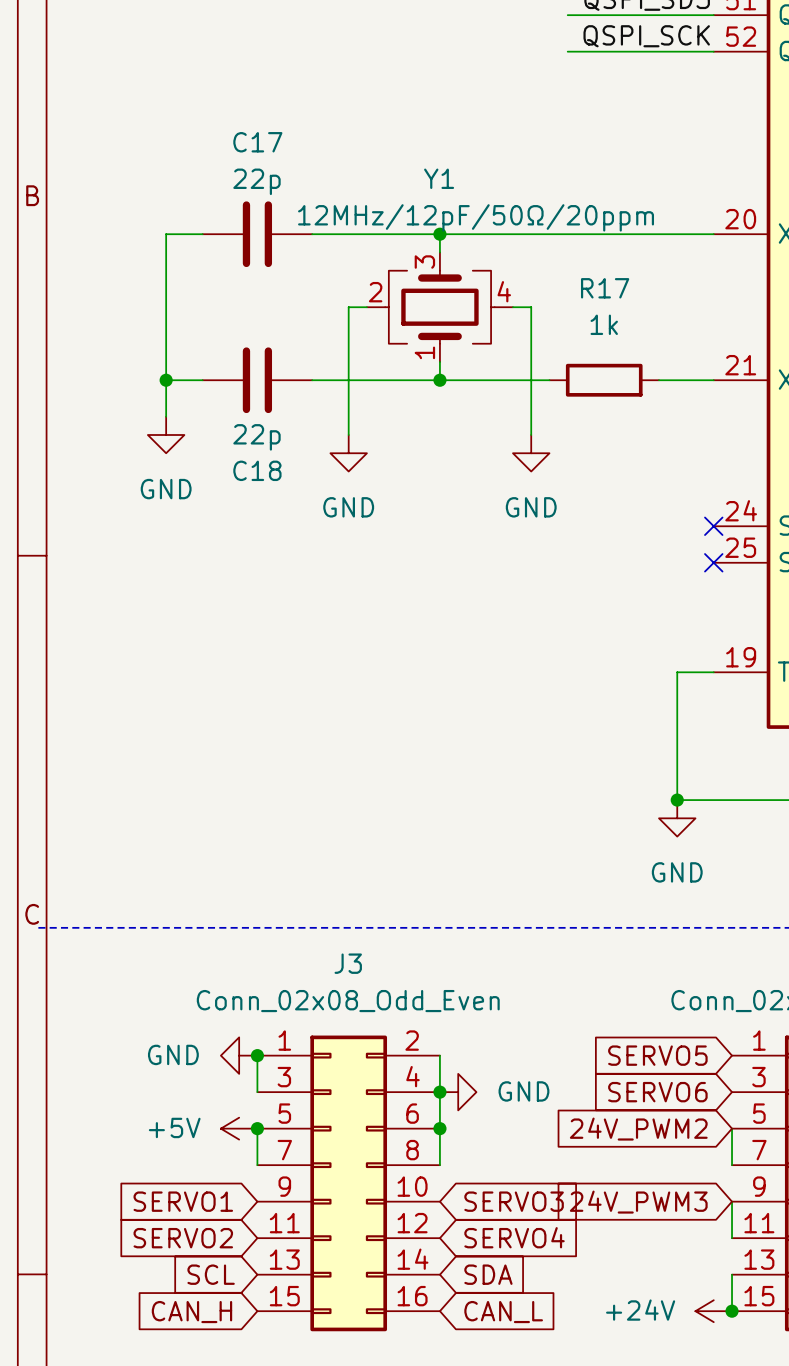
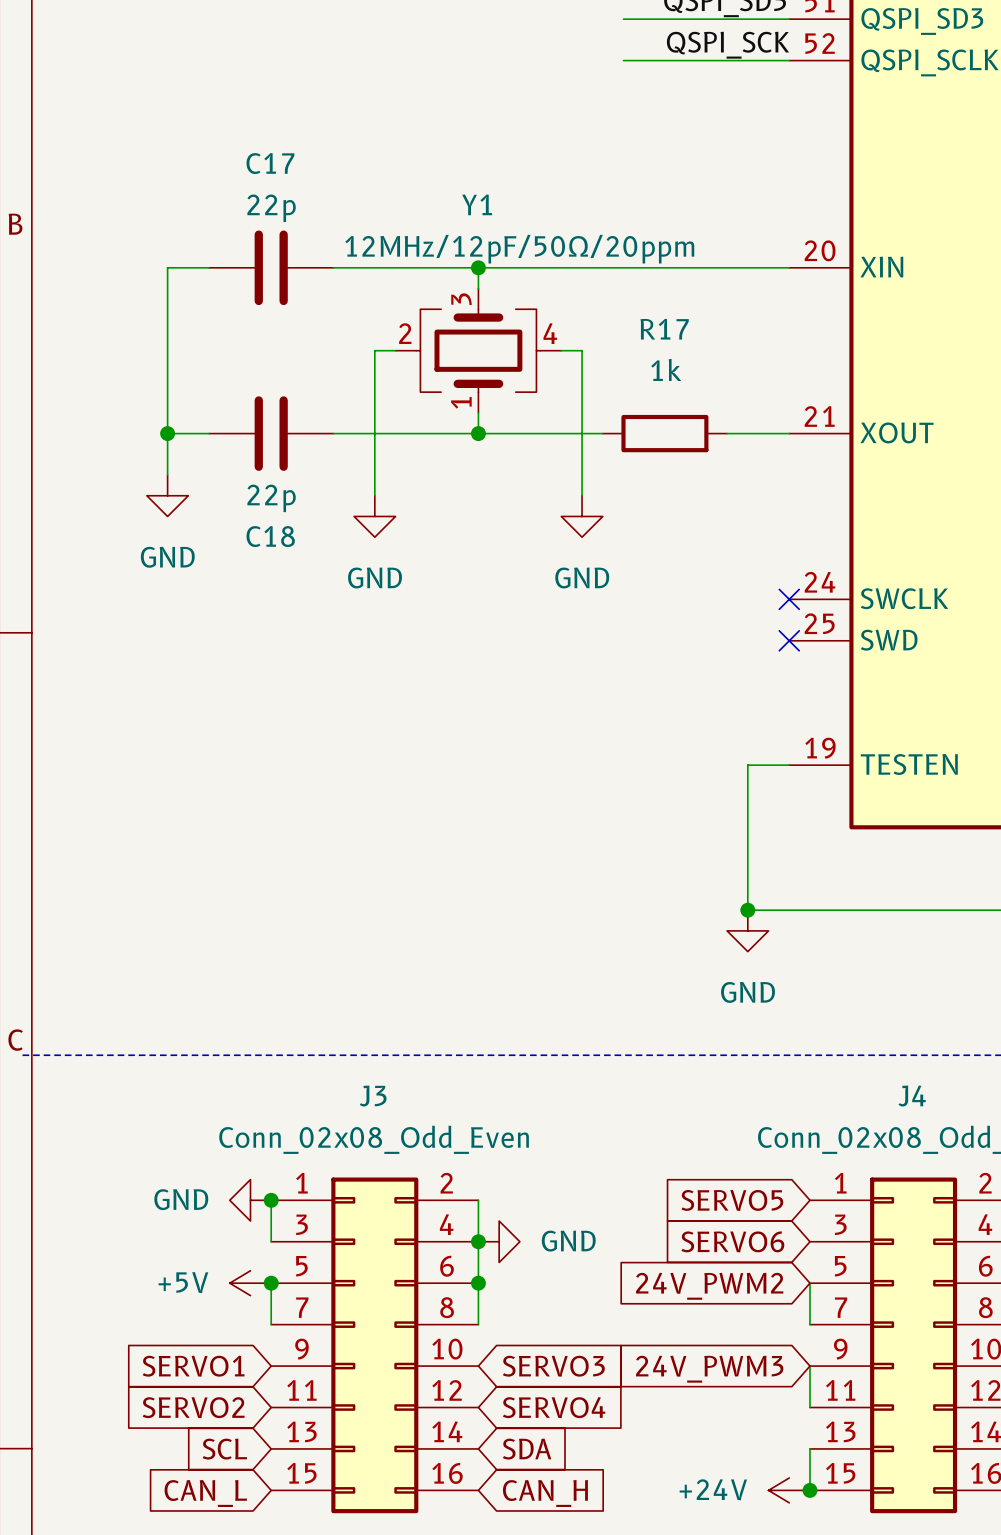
global label: CAN_H (191, 1312) -> CAN_L (205, 1493)
global label: CAN_L (503, 1312) -> CAN_H (545, 1493)

